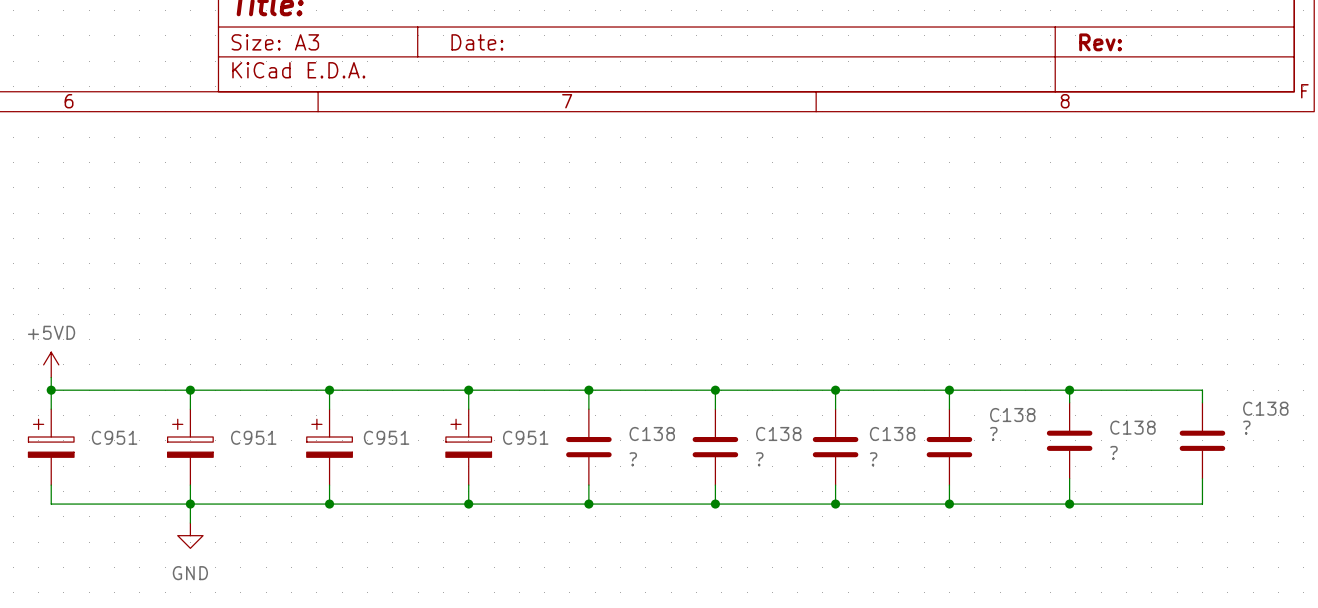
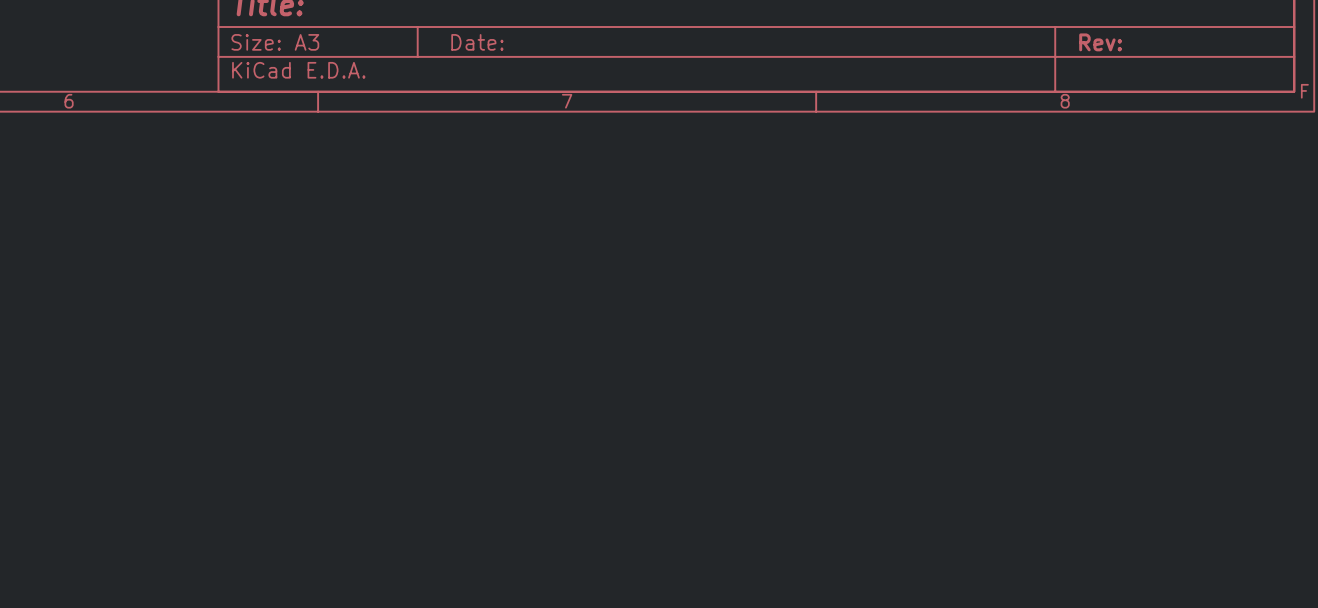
power symbol: +5VD (51, 364) -> none
wire: (51, 377) (51, 409) -> none
wire: (51, 390) (1202, 390) (1202, 402) -> none
junction: (51, 390) -> none
wire: (190, 390) (190, 409) -> none
junction: (190, 390) -> none
wire: (329, 390) (329, 409) -> none
junction: (329, 390) -> none
wire: (468, 390) (468, 409) -> none
junction: (468, 390) -> none
wire: (588, 390) (588, 409) -> none
junction: (588, 390) -> none
wire: (715, 390) (715, 409) -> none
junction: (715, 390) -> none
wire: (835, 390) (835, 409) -> none
junction: (835, 390) -> none
wire: (949, 390) (949, 409) -> none
junction: (949, 390) -> none
wire: (1069, 390) (1069, 402) -> none
junction: (1069, 390) -> none
C138: ? (1069, 440) -> none
C138: ? (1202, 440) -> none
C951: (51, 447) -> none
C951: (190, 447) -> none
C951: (329, 447) -> none
C951: (468, 447) -> none
C138: ? (588, 447) -> none
C138: ? (715, 447) -> none
C138: ? (835, 447) -> none
C138: ? (949, 447) -> none
wire: (1069, 478) (1069, 504) -> none
wire: (1202, 478) (1202, 504) (51, 504) (51, 485) -> none
wire: (190, 485) (190, 523) -> none
wire: (329, 485) (329, 504) -> none
wire: (468, 485) (468, 504) -> none
wire: (588, 485) (588, 504) -> none
wire: (715, 485) (715, 504) -> none
wire: (835, 485) (835, 504) -> none
wire: (949, 485) (949, 504) -> none
junction: (190, 504) -> none
junction: (329, 504) -> none
junction: (468, 504) -> none
junction: (588, 504) -> none
junction: (715, 504) -> none
junction: (835, 504) -> none
junction: (949, 504) -> none
junction: (1069, 504) -> none
power symbol: GND (190, 535) -> none

